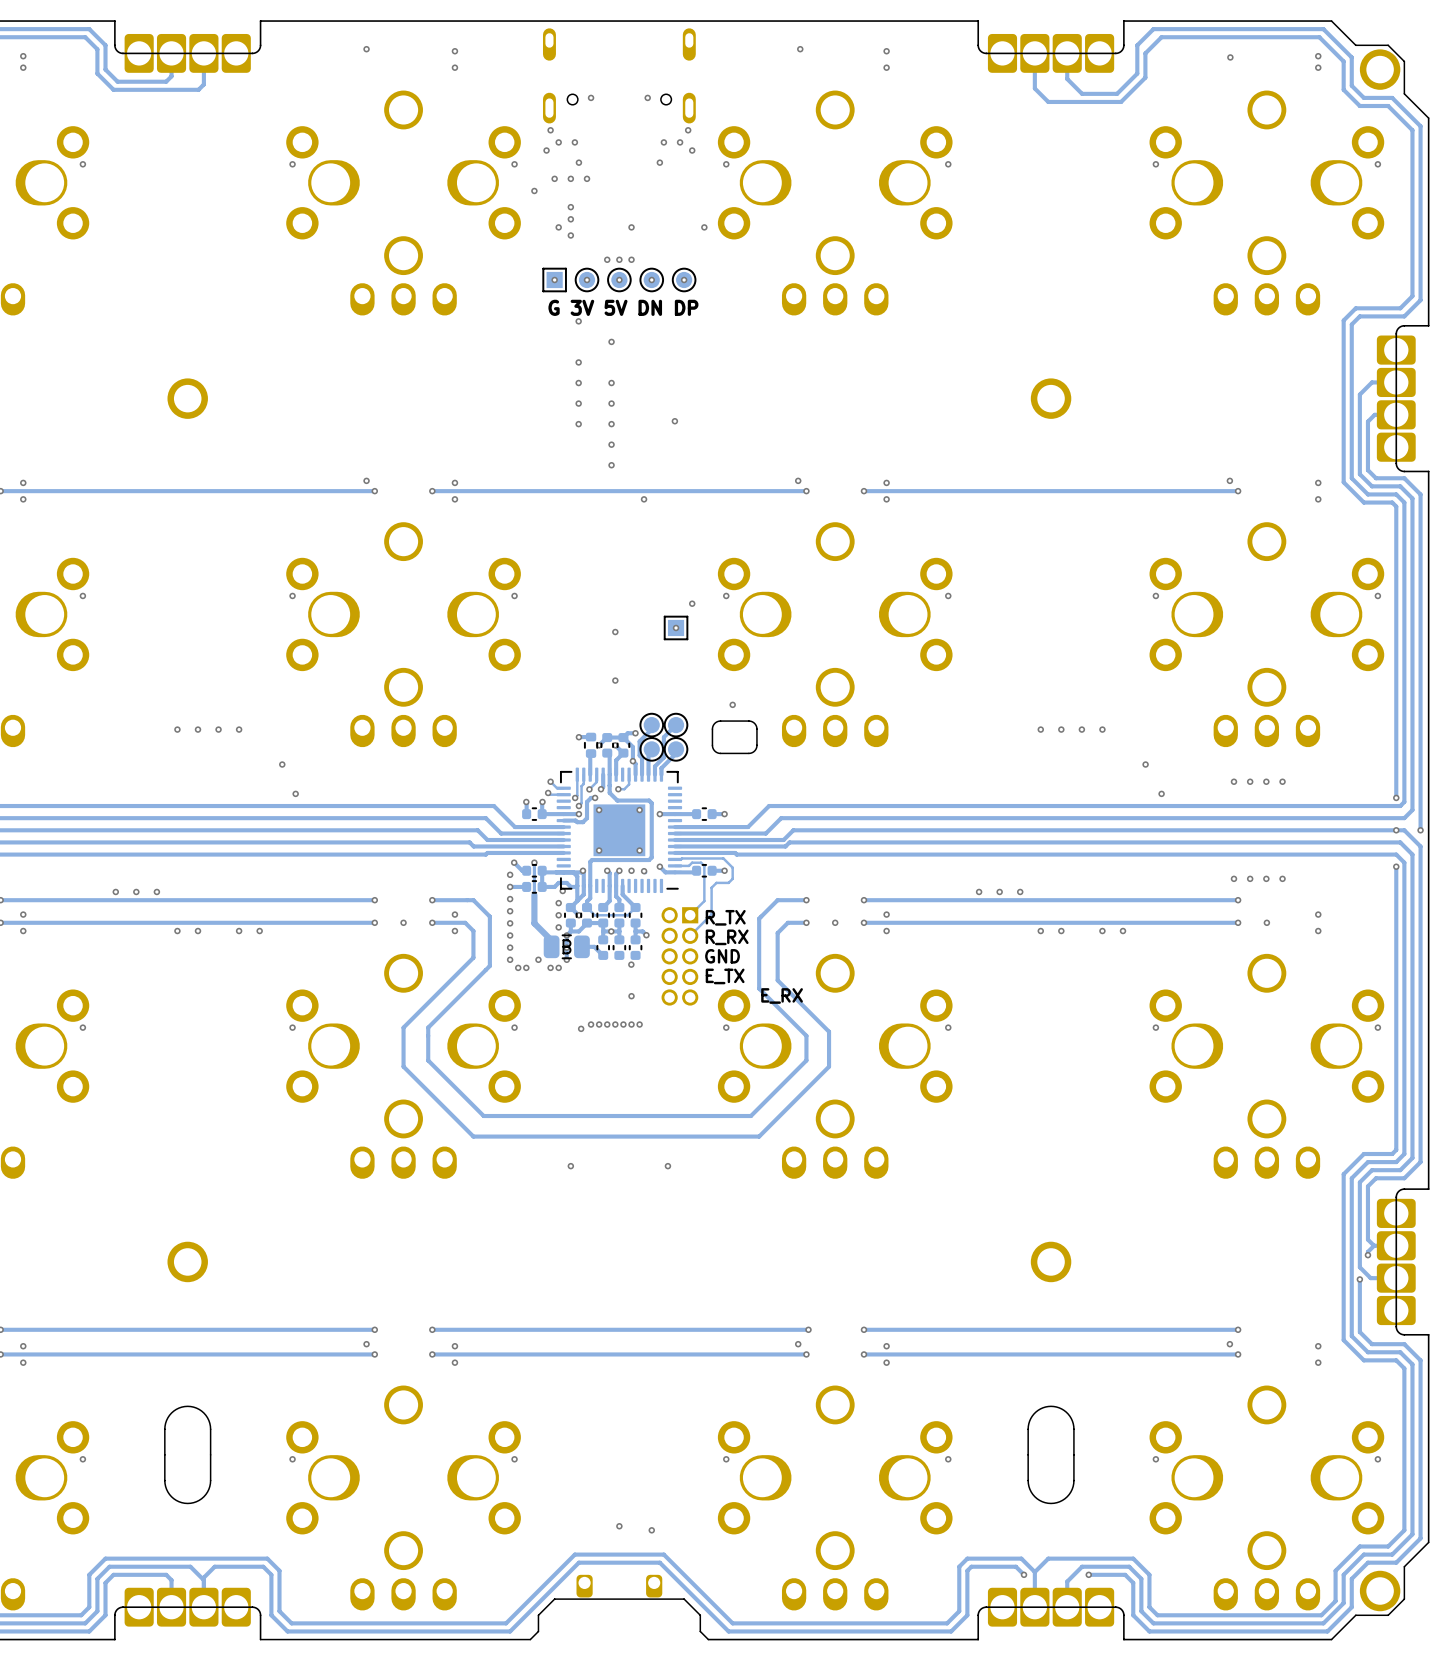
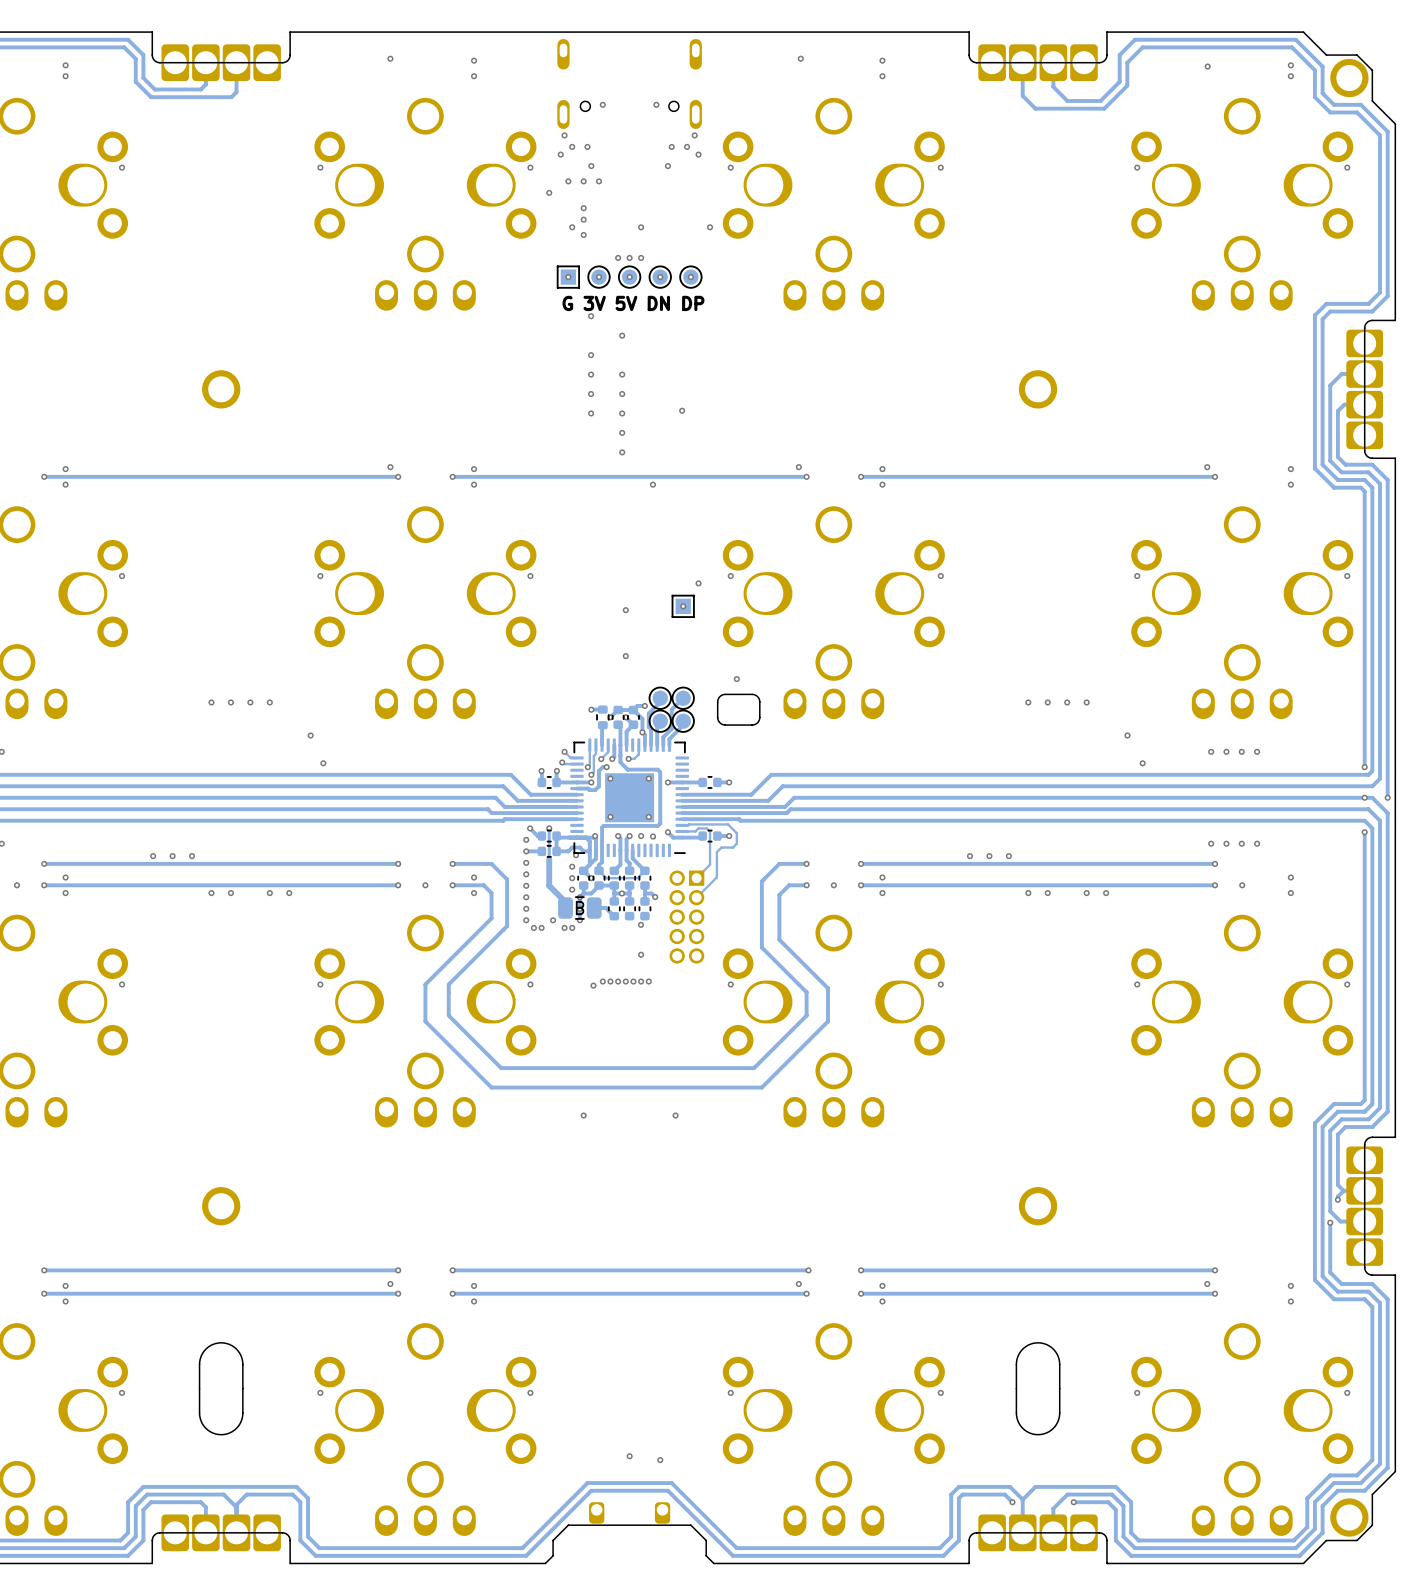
text: R_TX (725, 917) -> none
text: R_RX (727, 937) -> none
text: GND (722, 956) -> none
text: E_TX (725, 976) -> none
text: E_RX (782, 995) -> none

